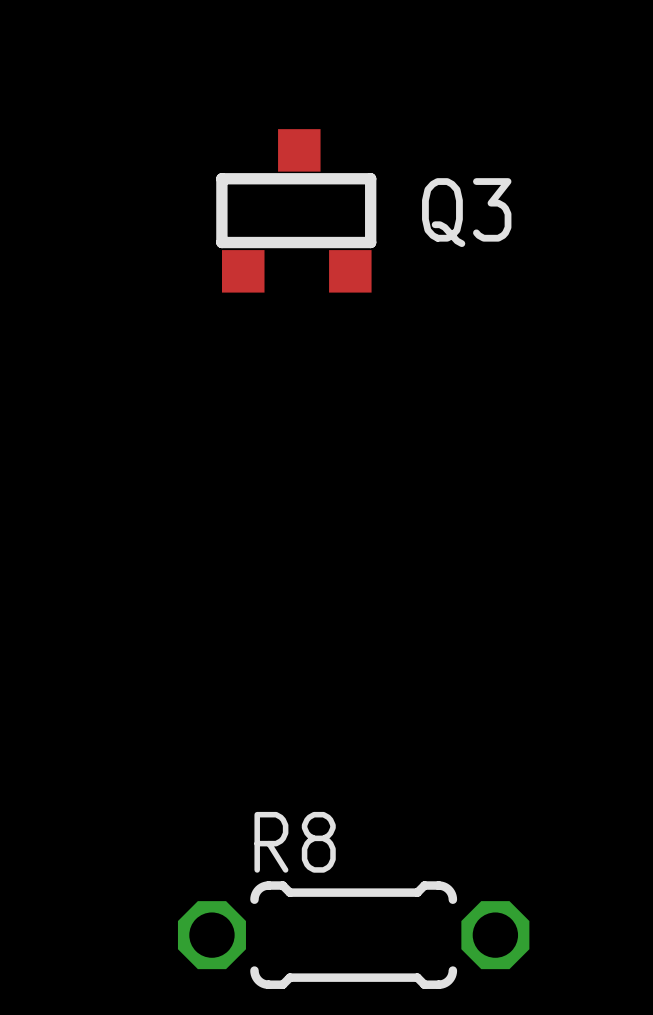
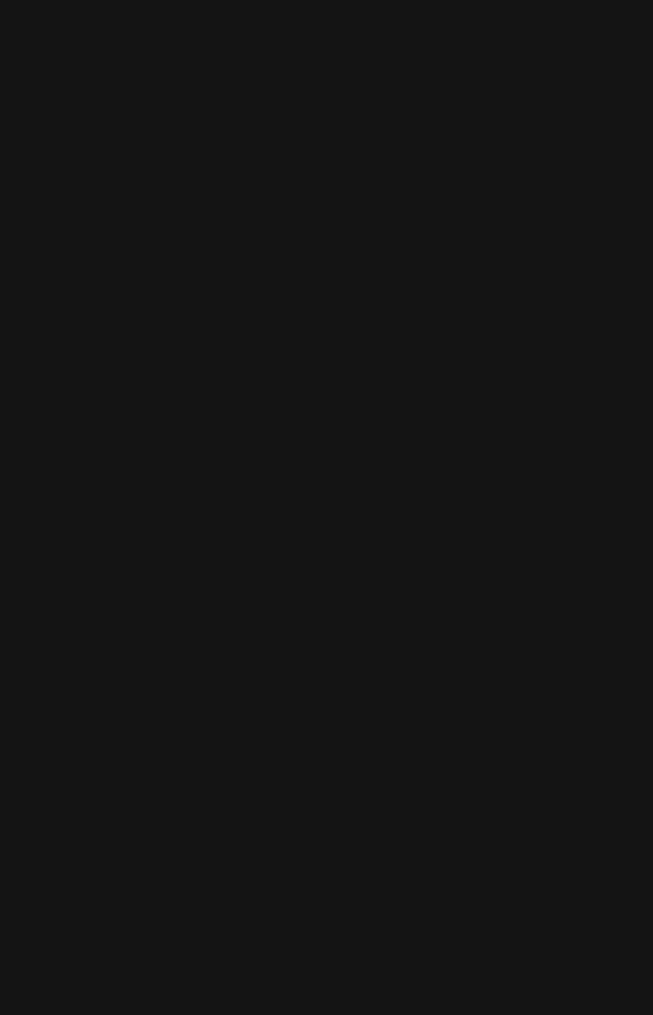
Q3: (296, 210) -> none
R8: (353, 935) -> none

